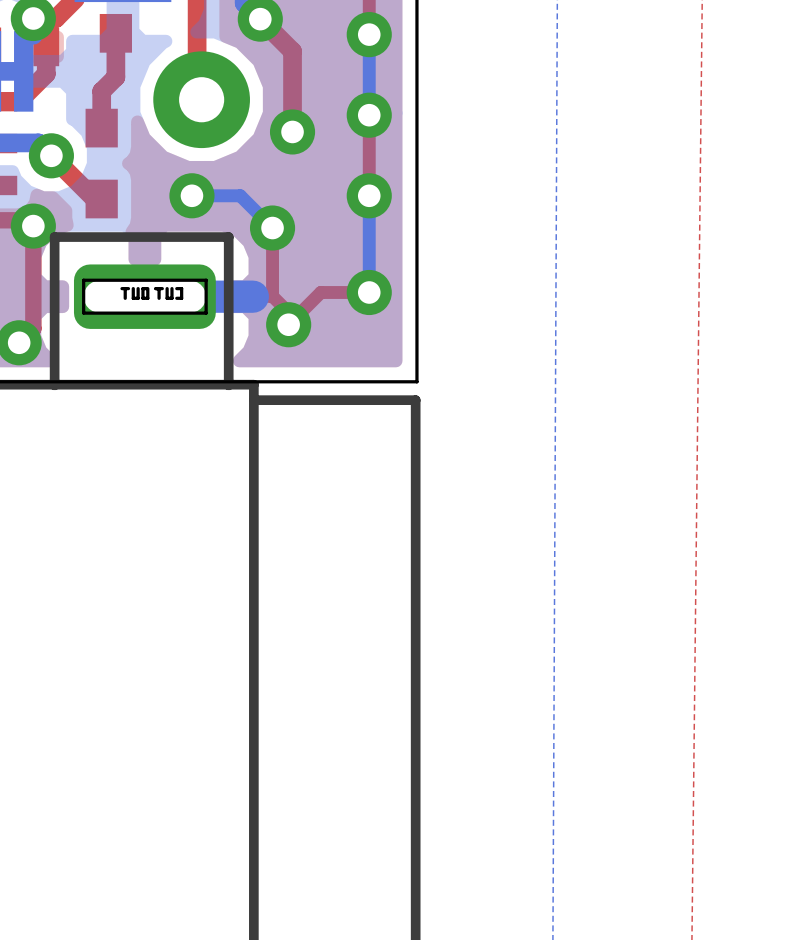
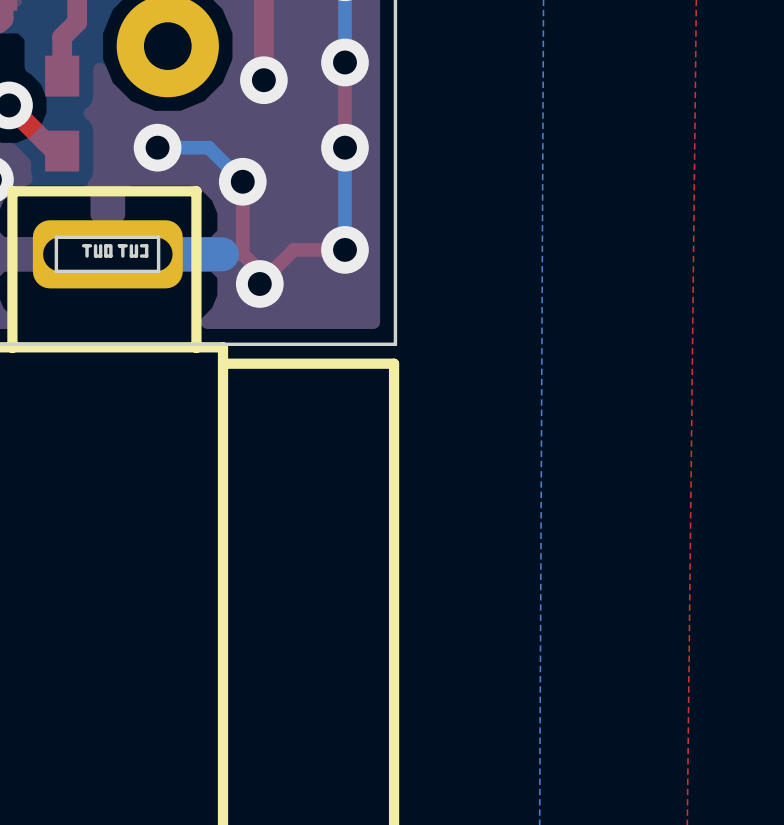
board edge: (96, 280) (83, 280) (83, 312) -> none
board edge: (192, 280) (206, 280) (206, 313) (83, 313) -> (158, 237) (158, 271) (56, 271) (56, 237)

